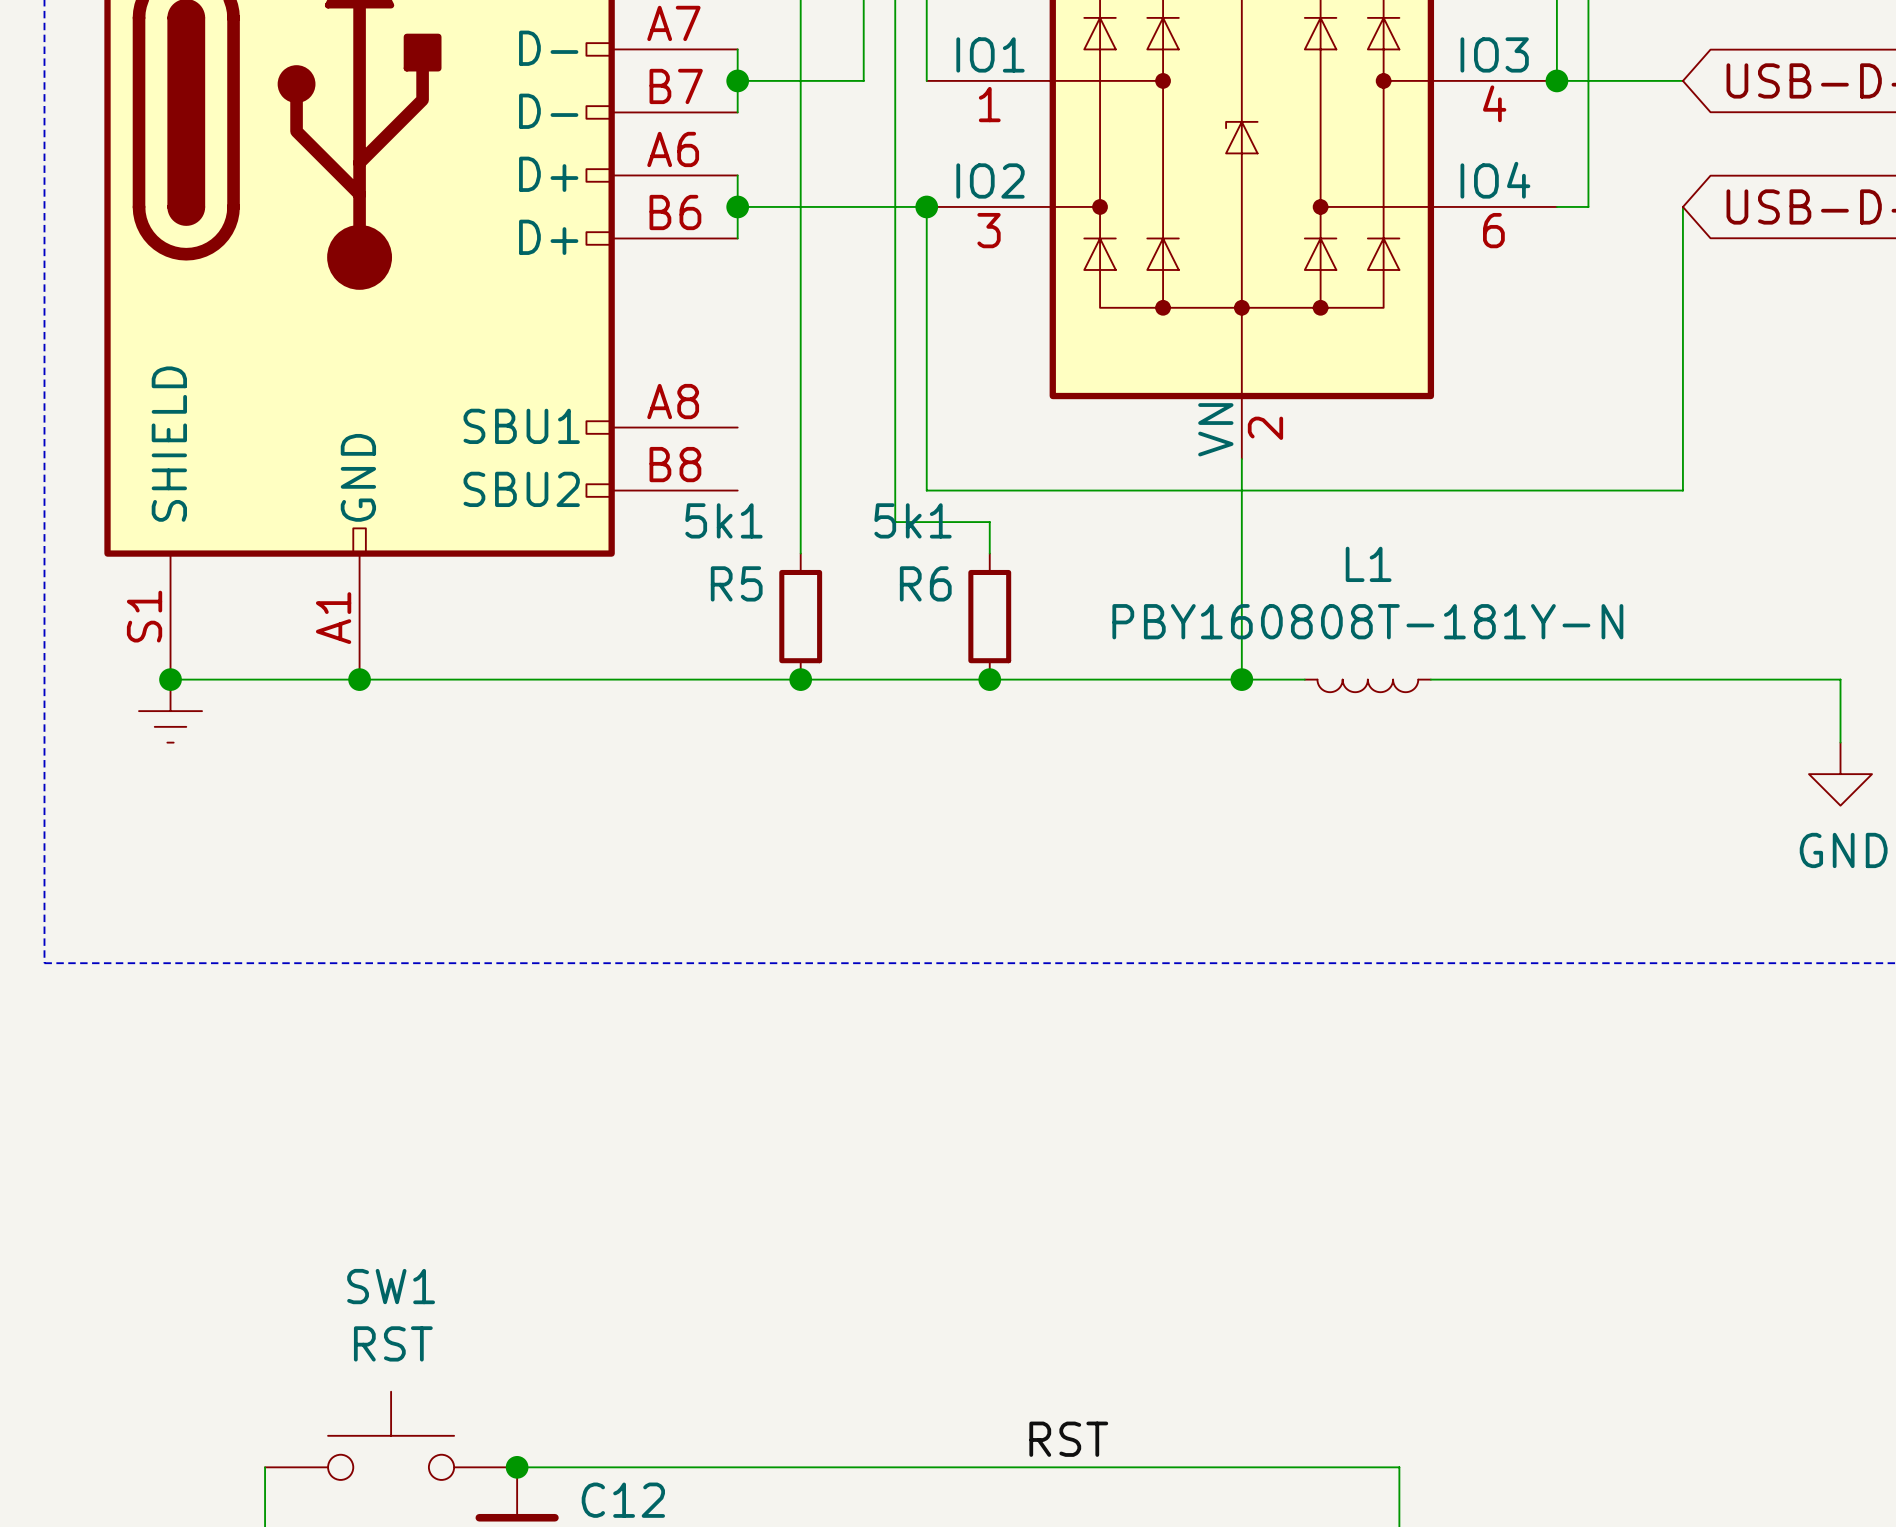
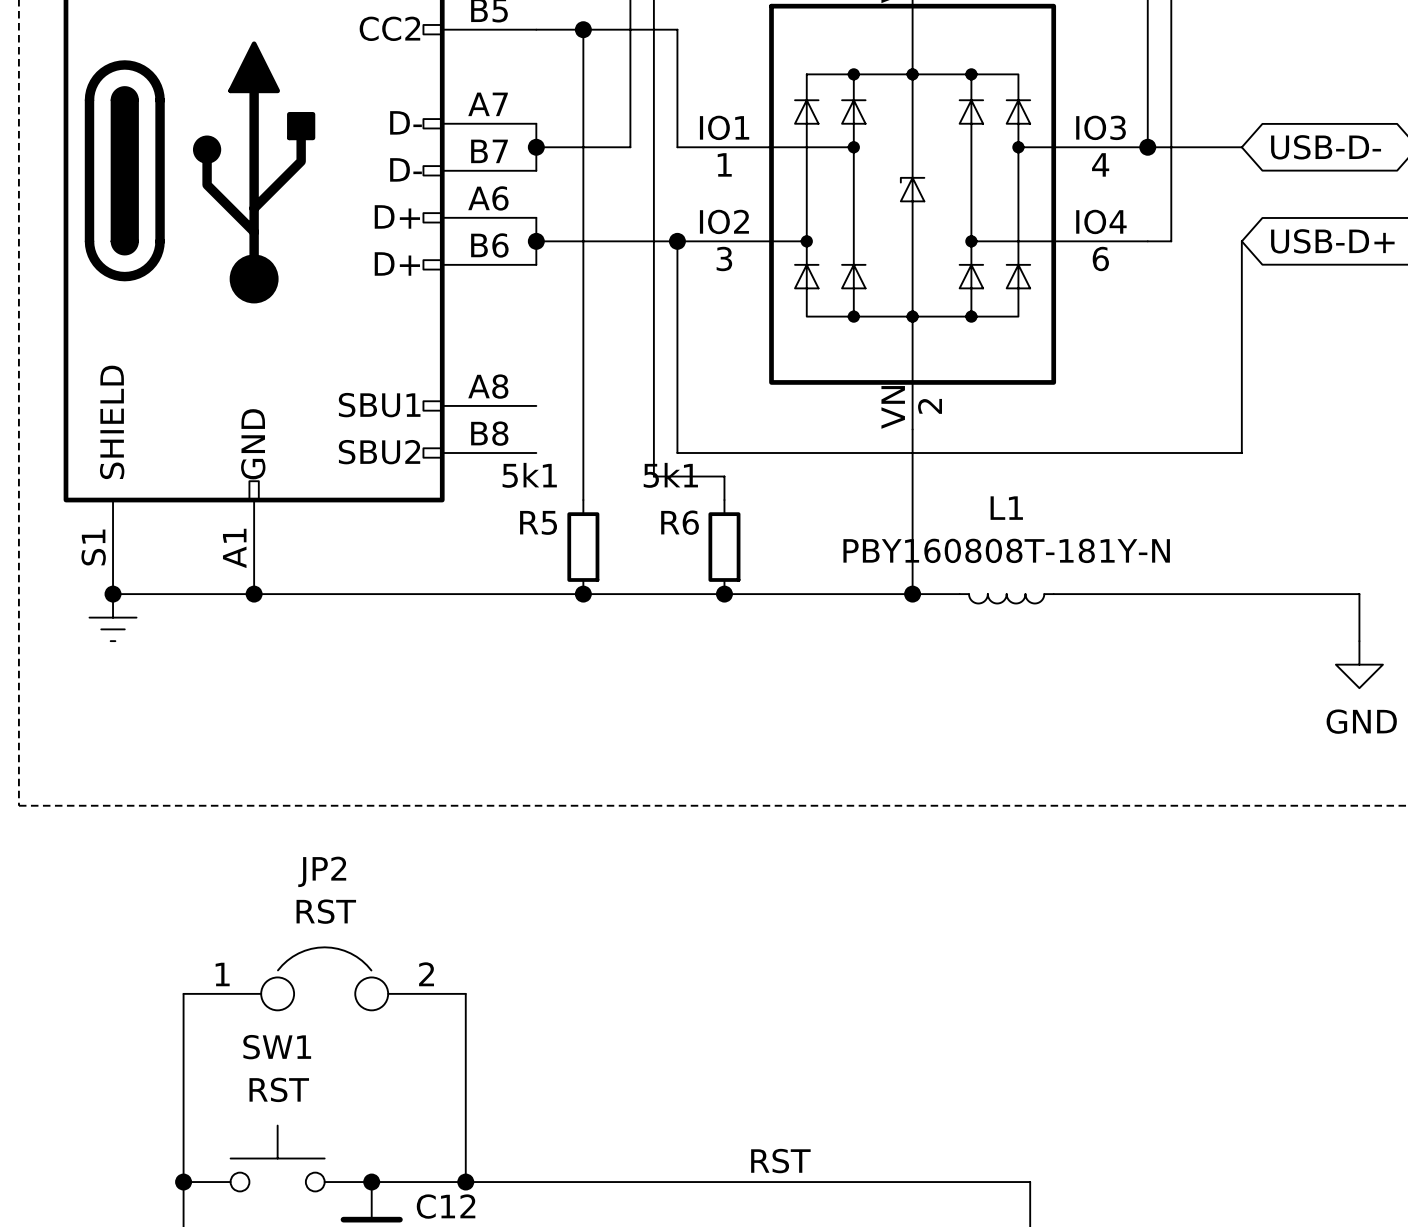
JP2: none -> RST (324, 978)
wire: none -> (183, 993) (183, 1182)
wire: none -> (465, 993) (465, 1182)
junction: none -> (183, 1182)
junction: none -> (465, 1182)

